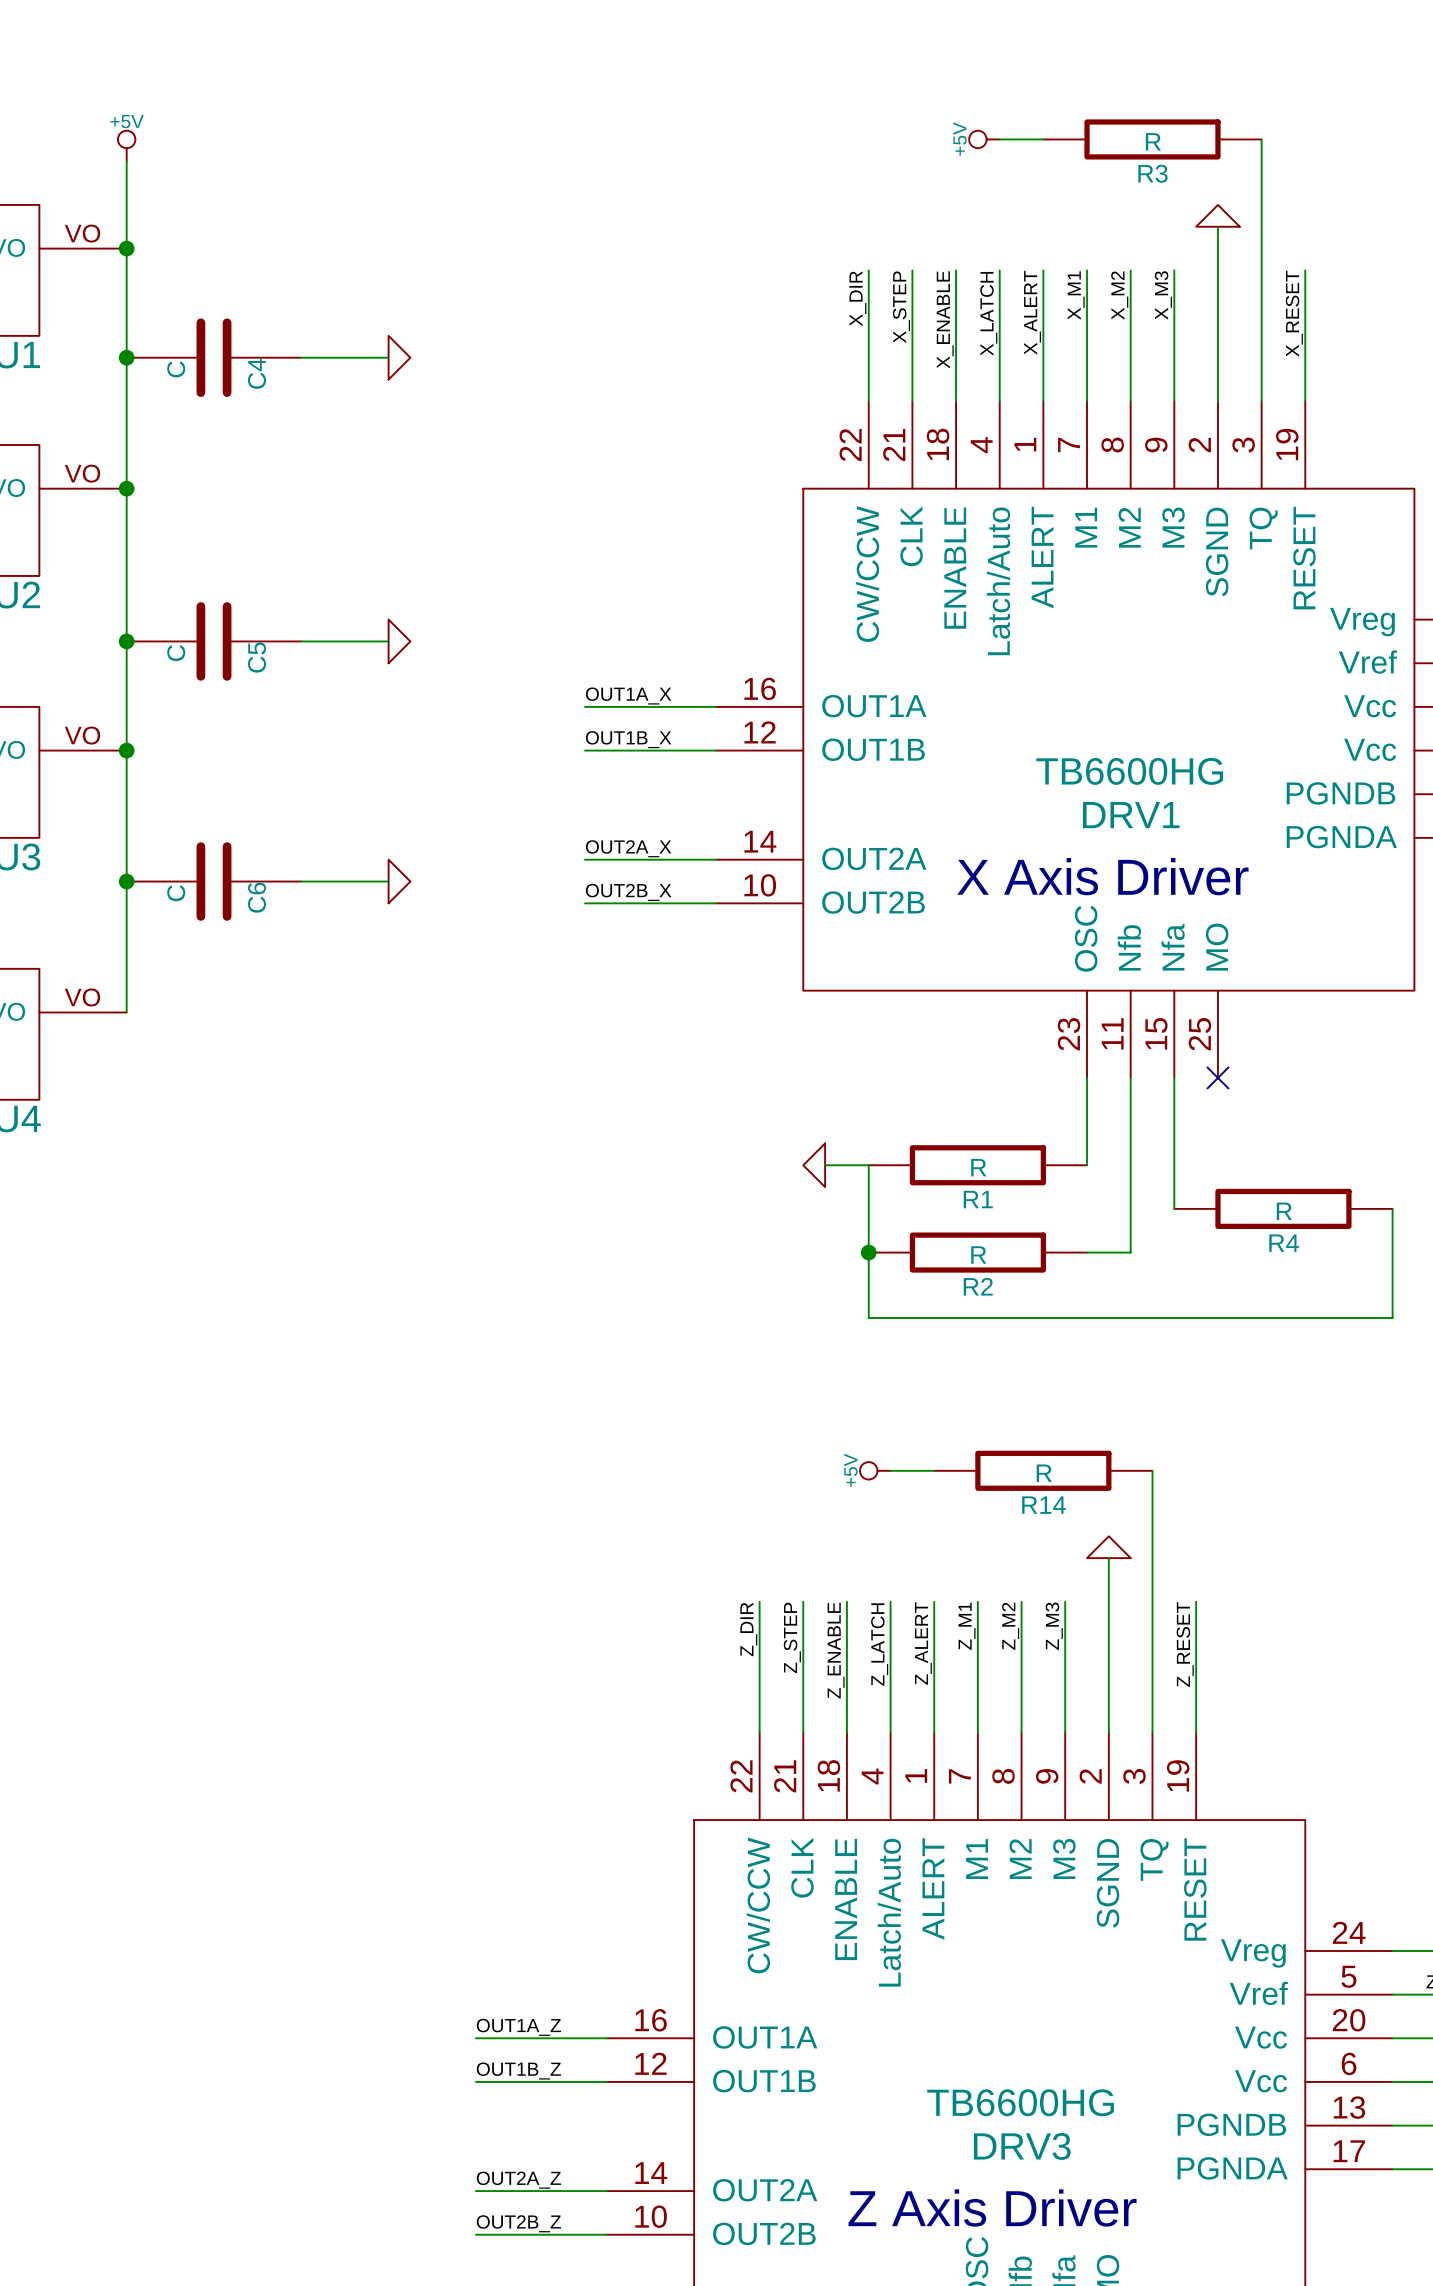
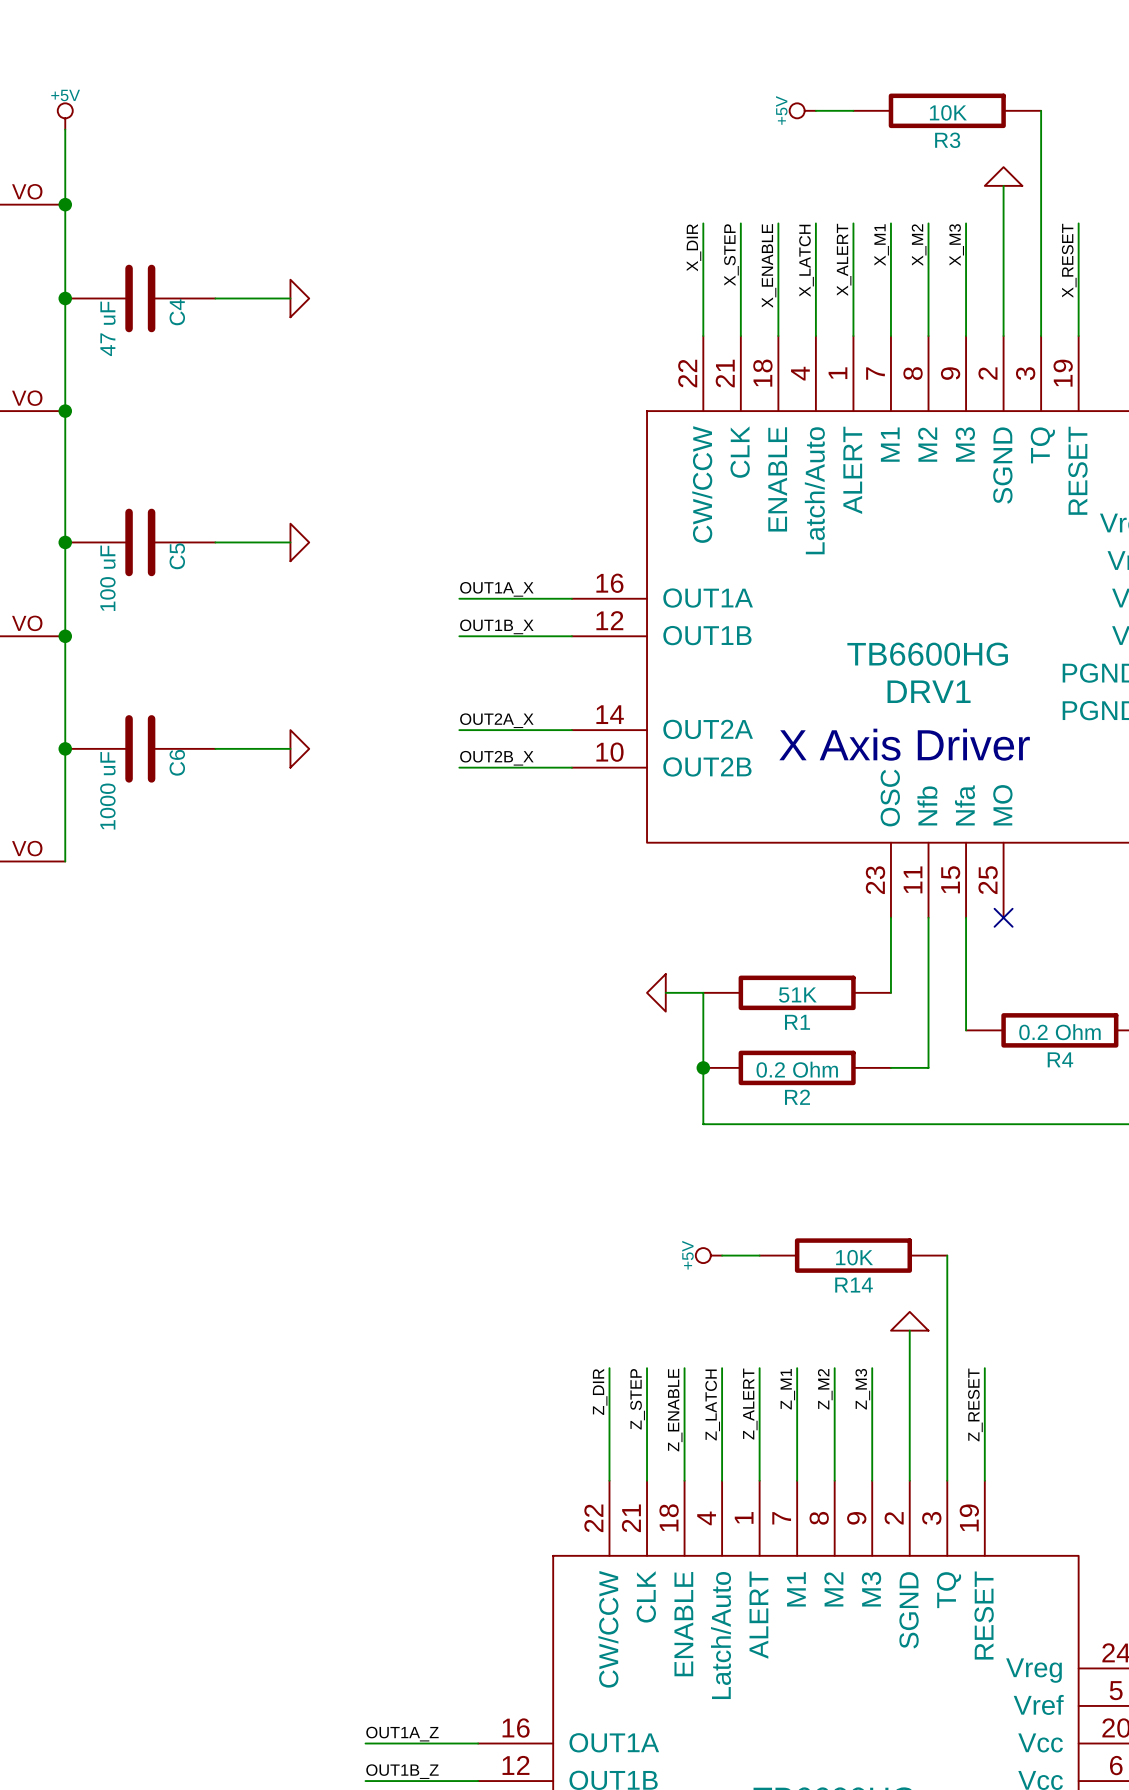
R3 value: R (1153, 141) -> 10K (948, 112)
C4 value: C (176, 369) -> 47 uF (107, 328)
C5 value: C (176, 653) -> 100 uF (107, 578)
C6 value: C (176, 893) -> 1000 uF (107, 790)
R1 value: R (978, 1167) -> 51K (797, 995)
R4 value: R (1284, 1211) -> 0.2 Ohm (1059, 1032)
R2 value: R (978, 1254) -> 0.2 Ohm (797, 1069)
R14 value: R (1044, 1473) -> 10K (854, 1257)

